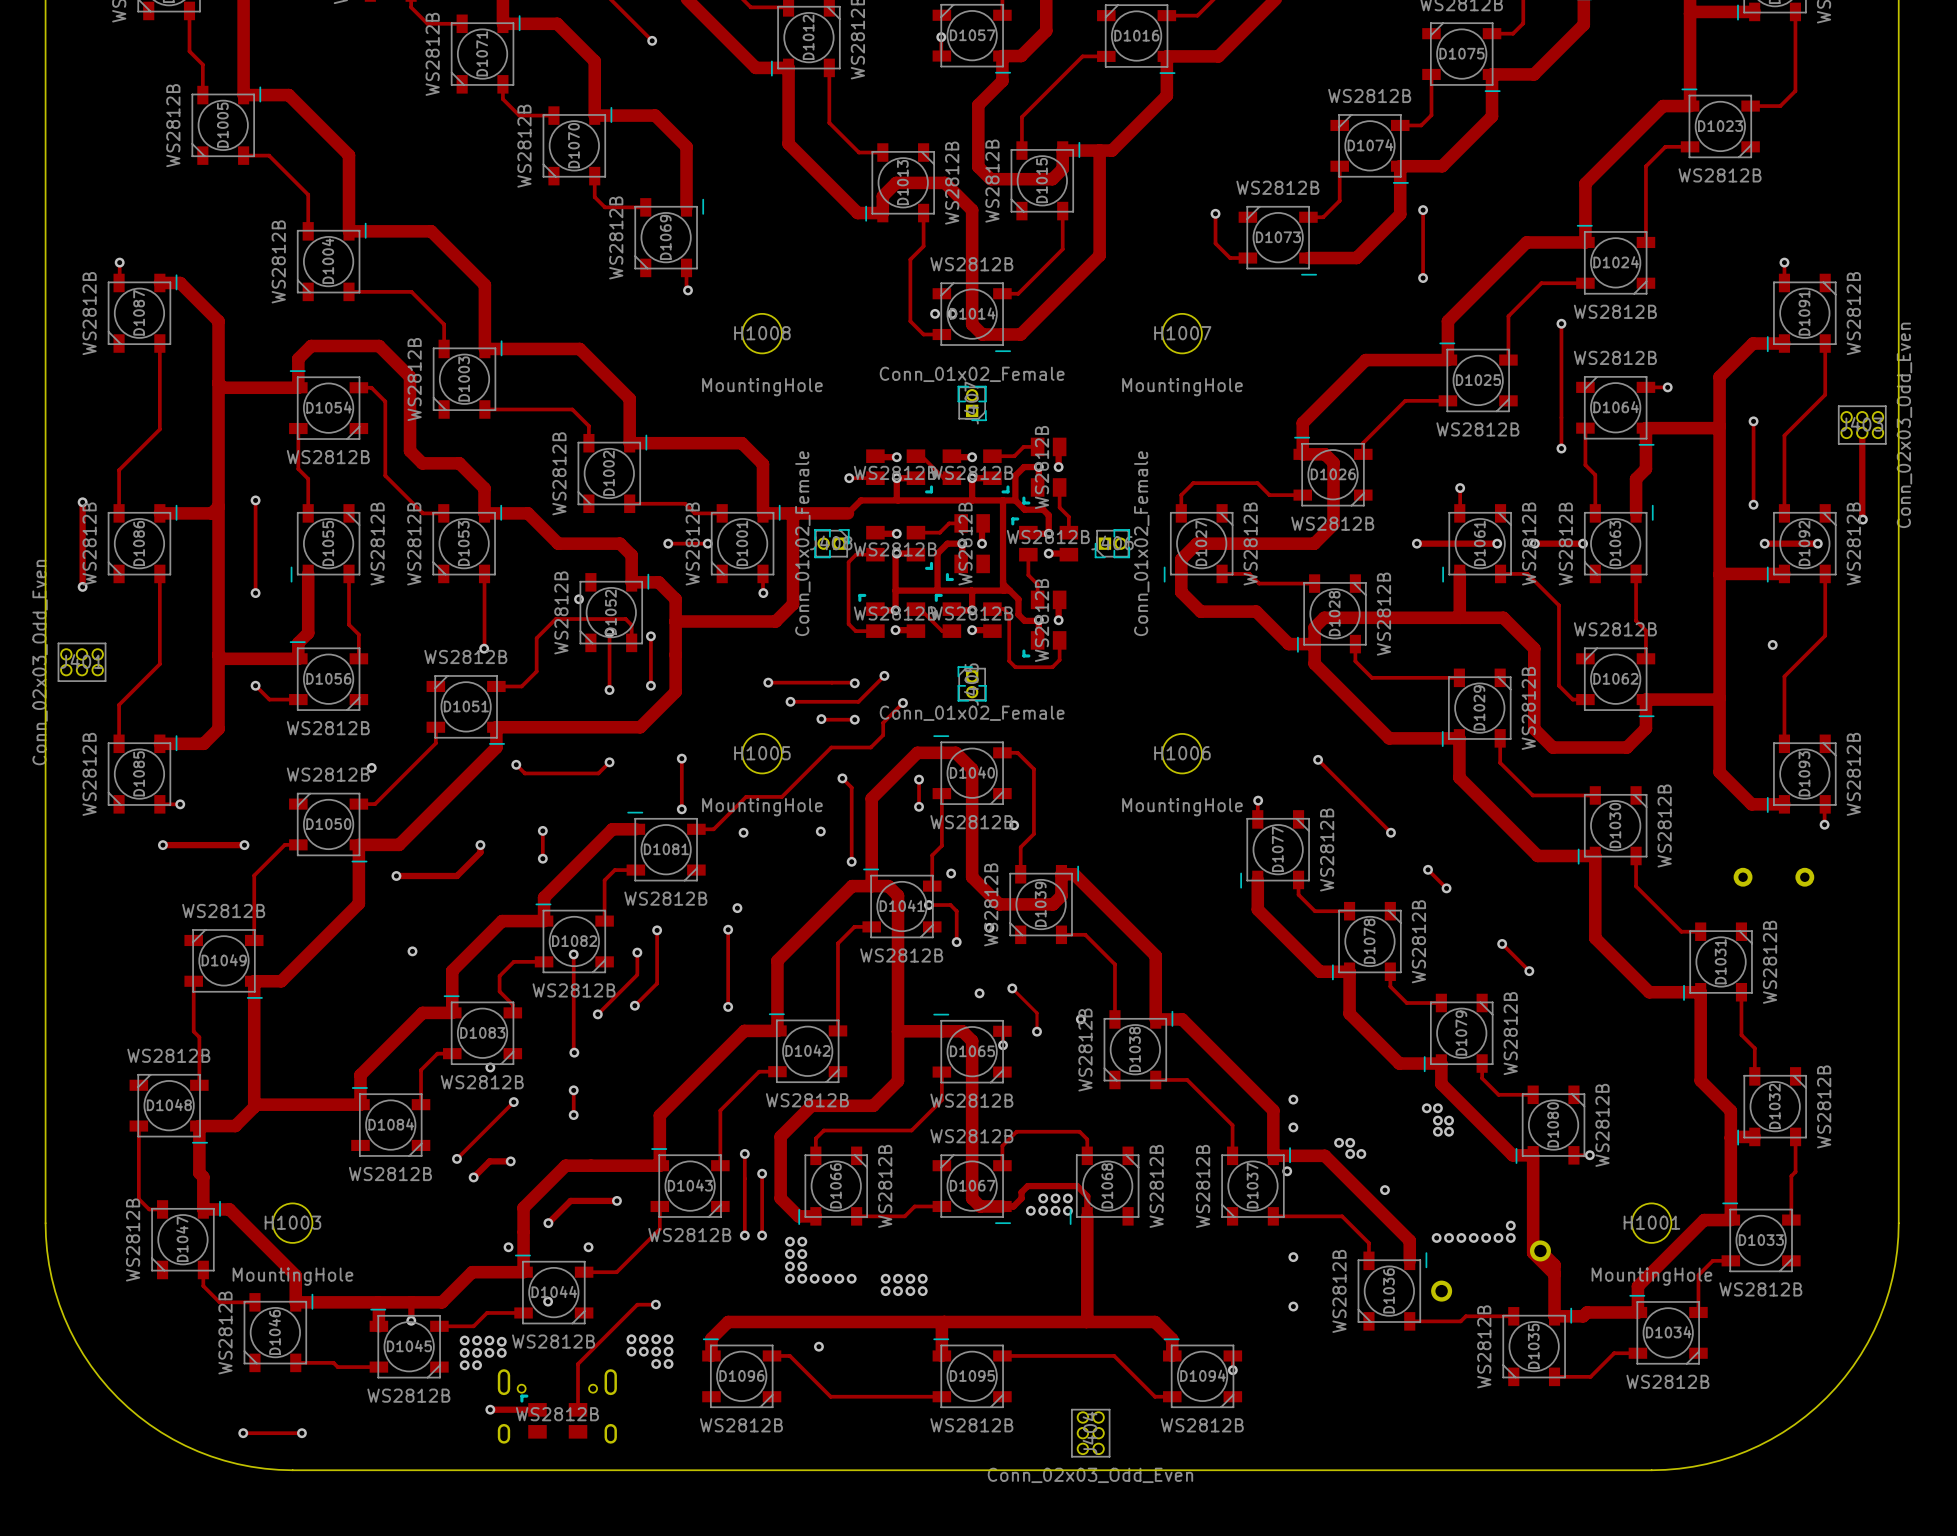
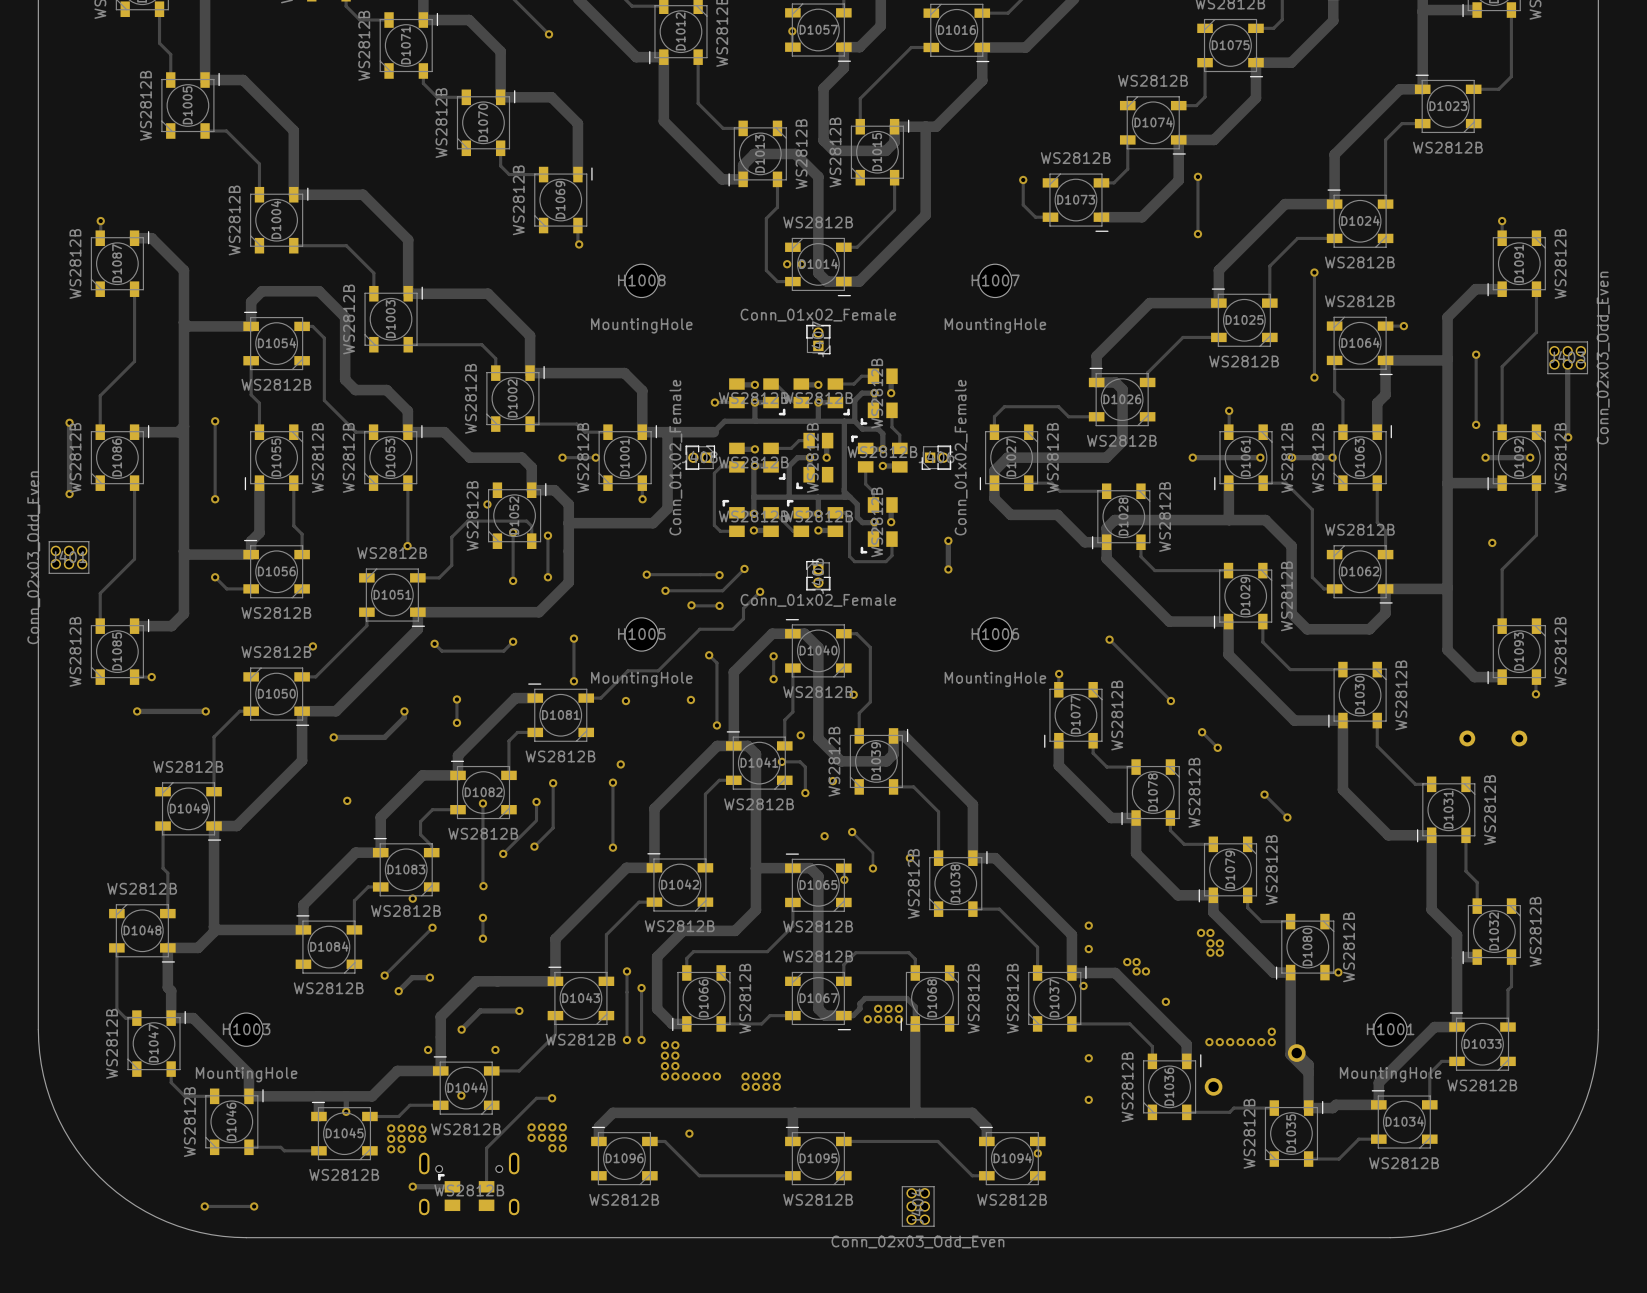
track: none -> (948, 540) (948, 569)
via: none -> (948, 540)
via: none -> (948, 569)

